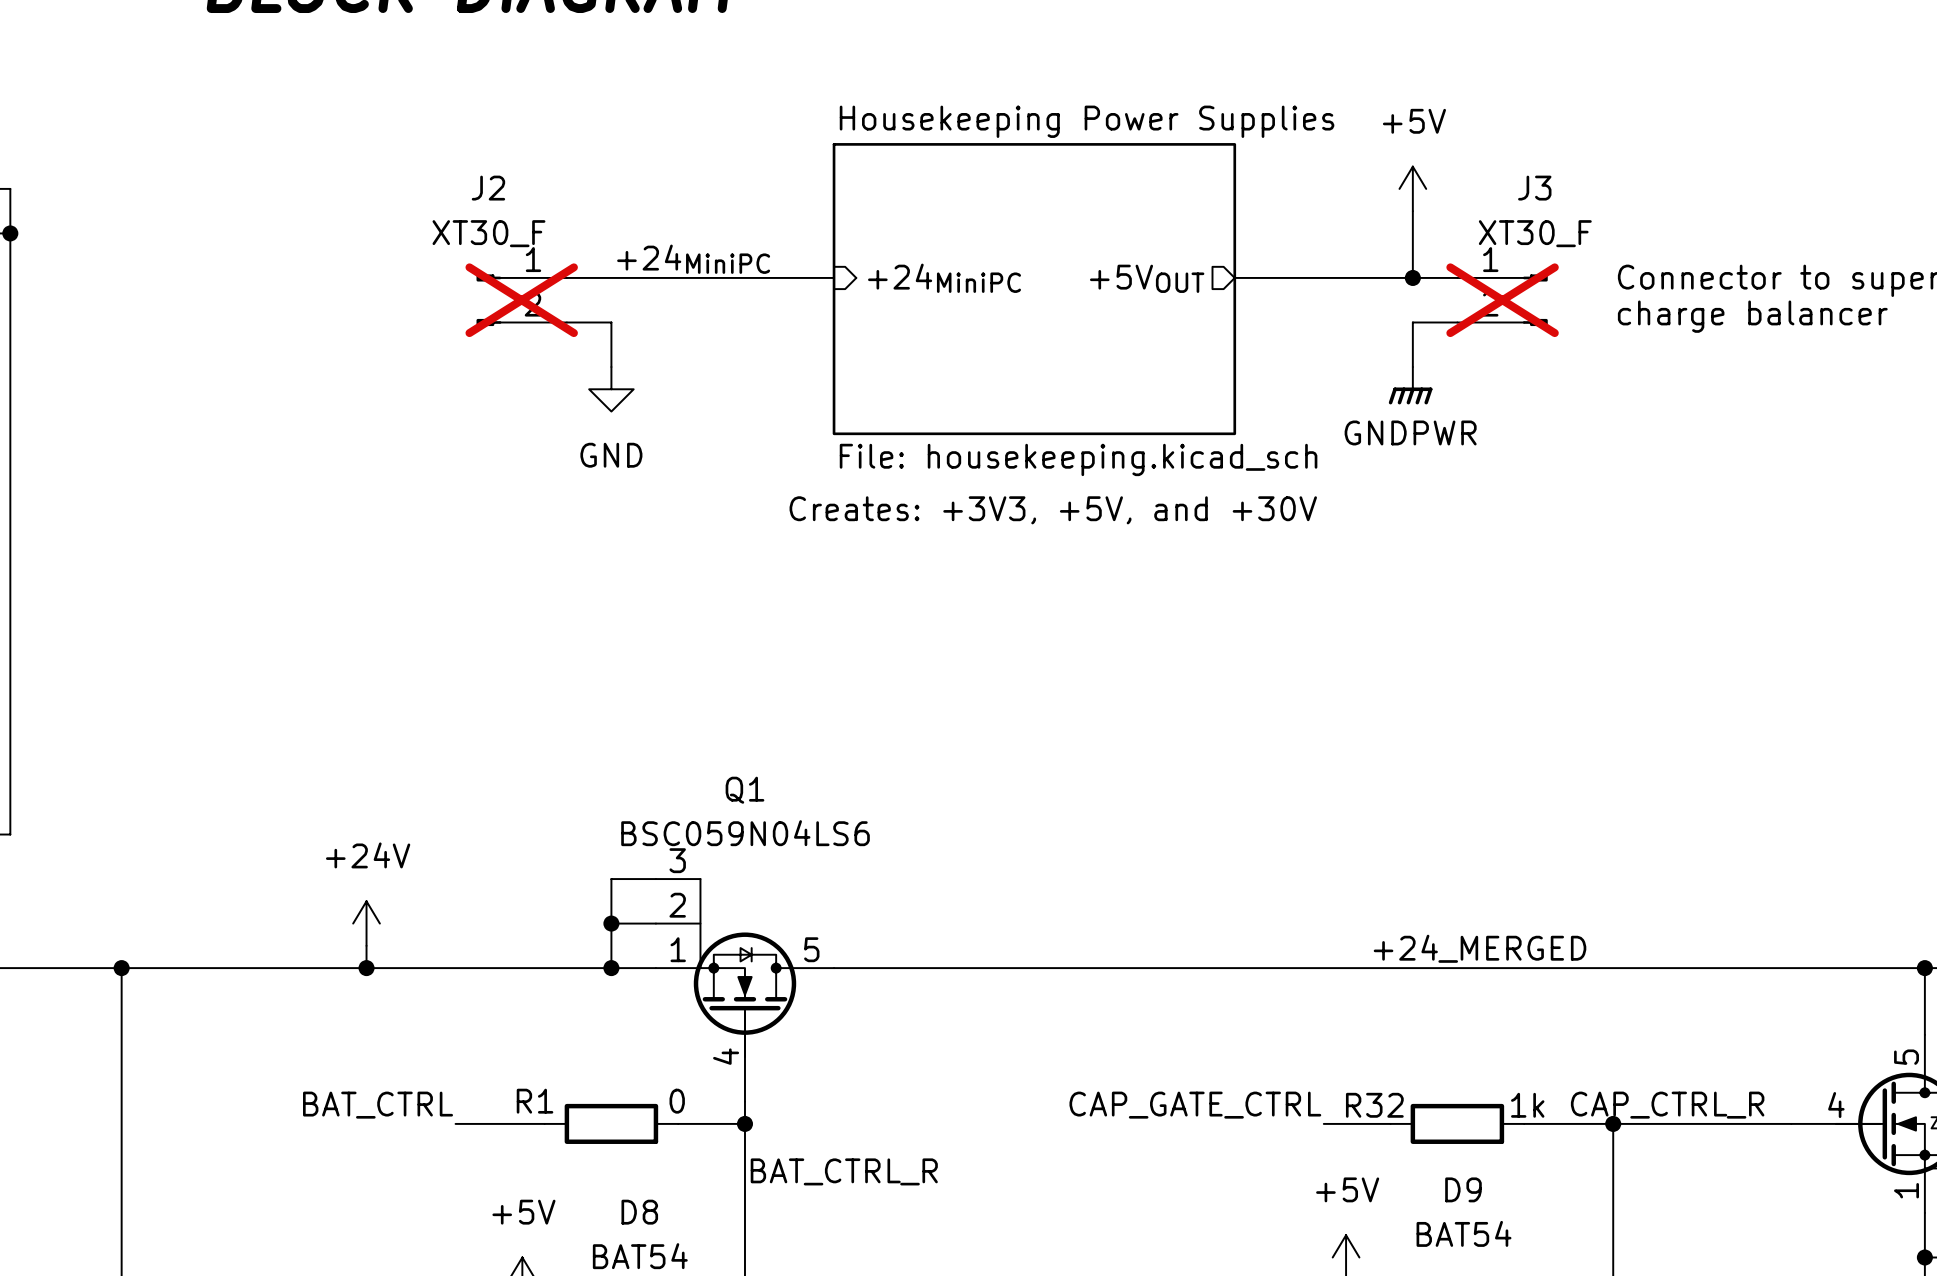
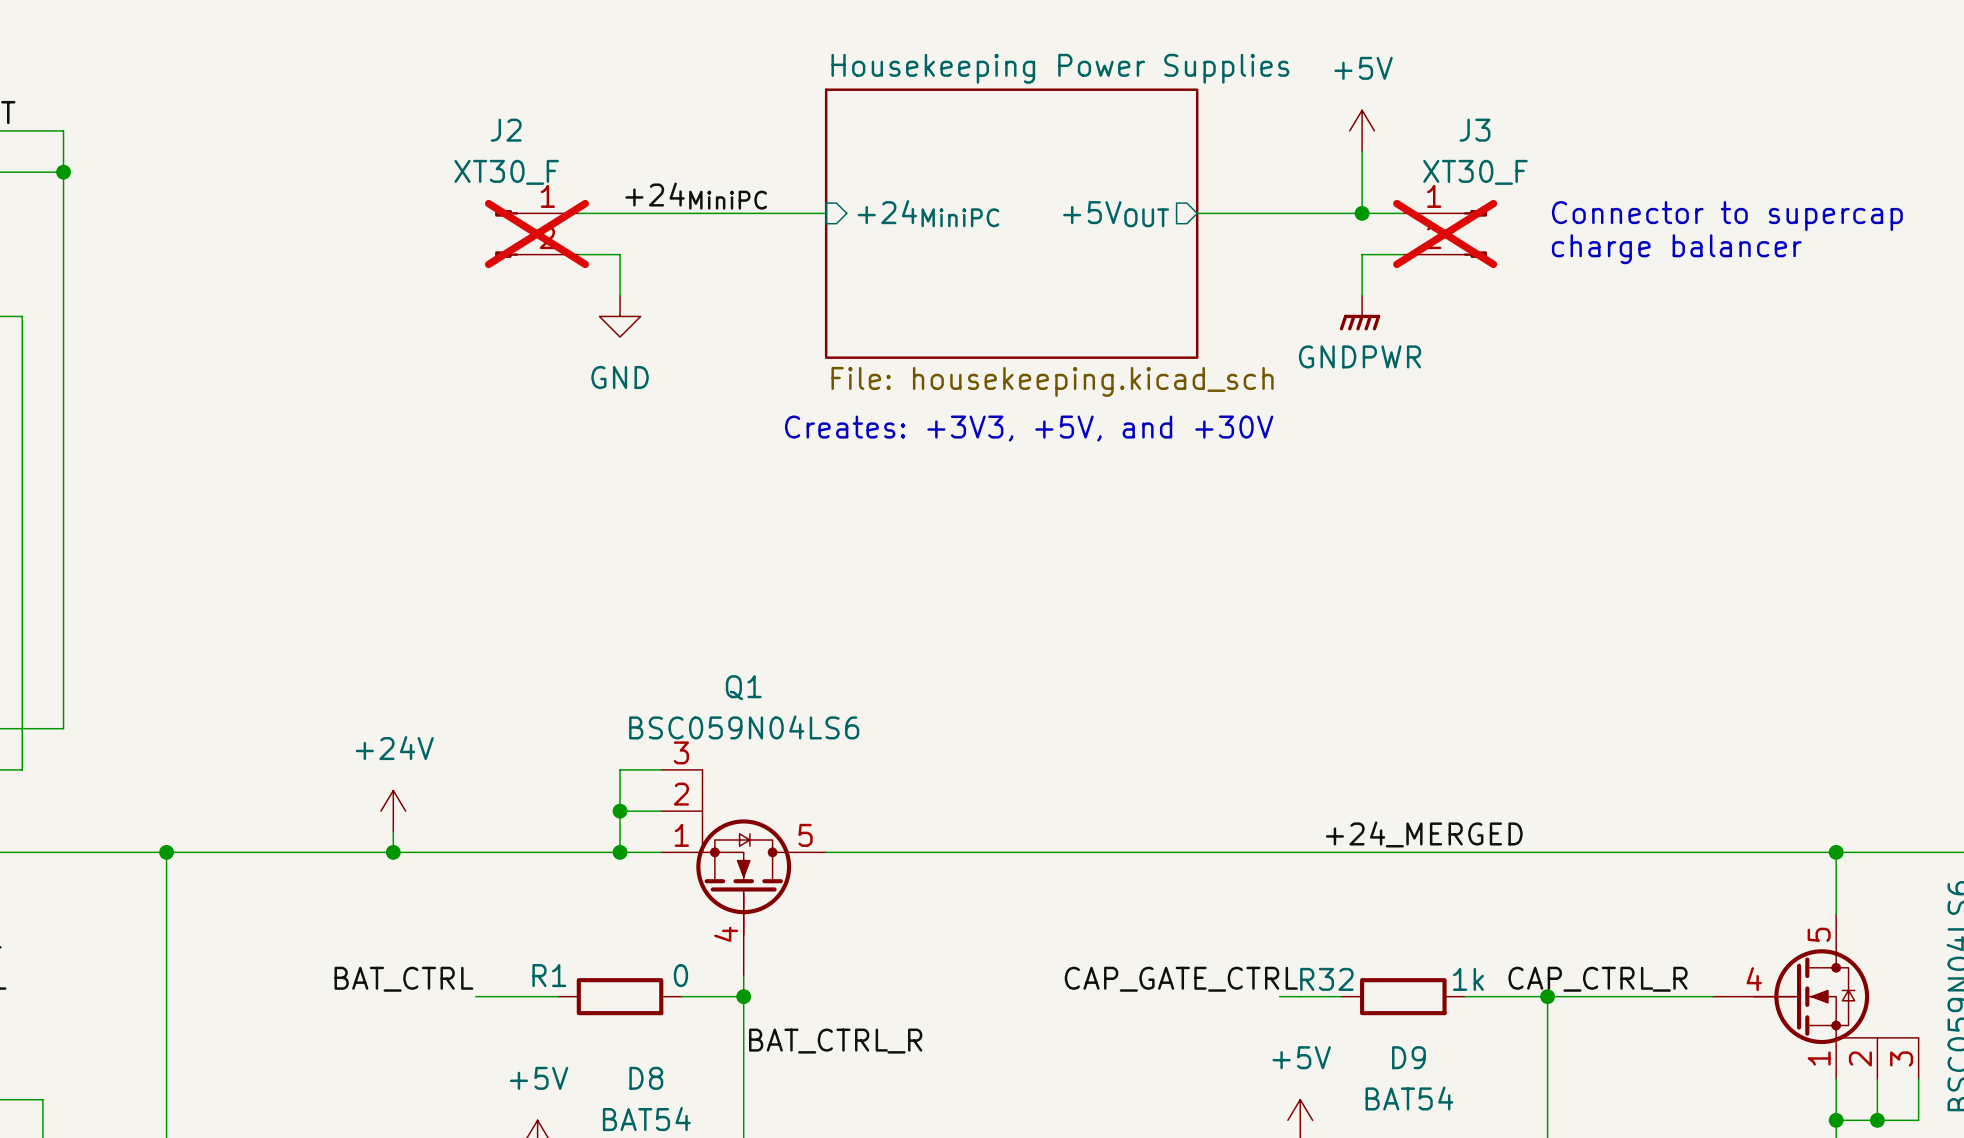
label position: CAP_GATE_CTRL (1195, 1105) -> CAP_GATE_CTRL (1181, 979)

